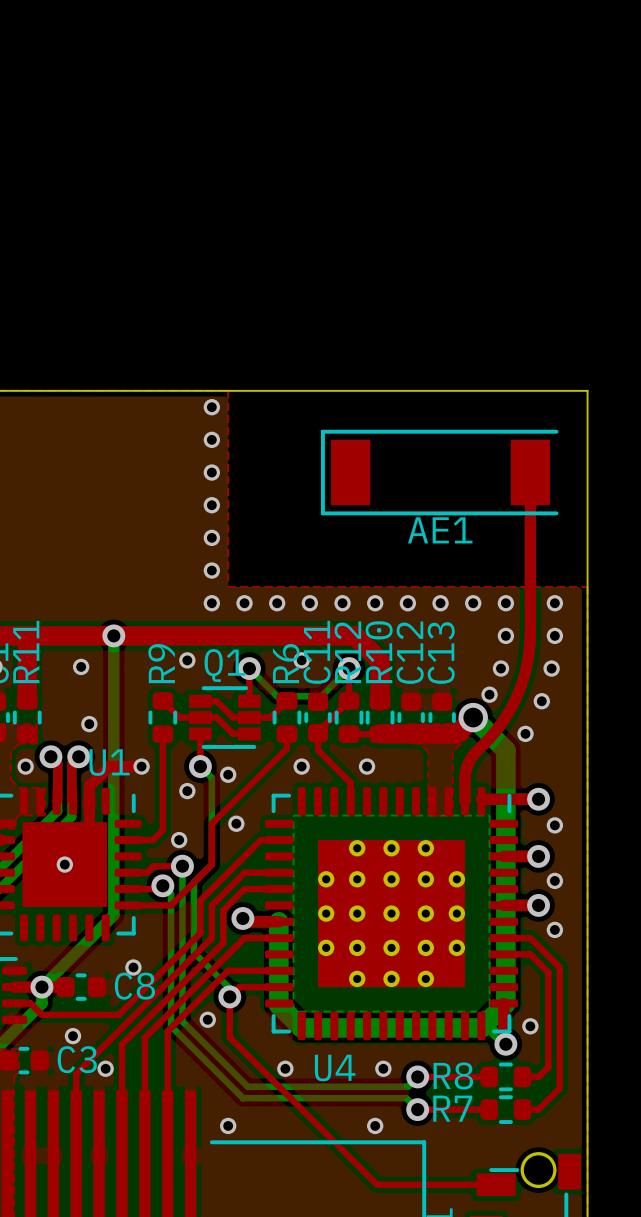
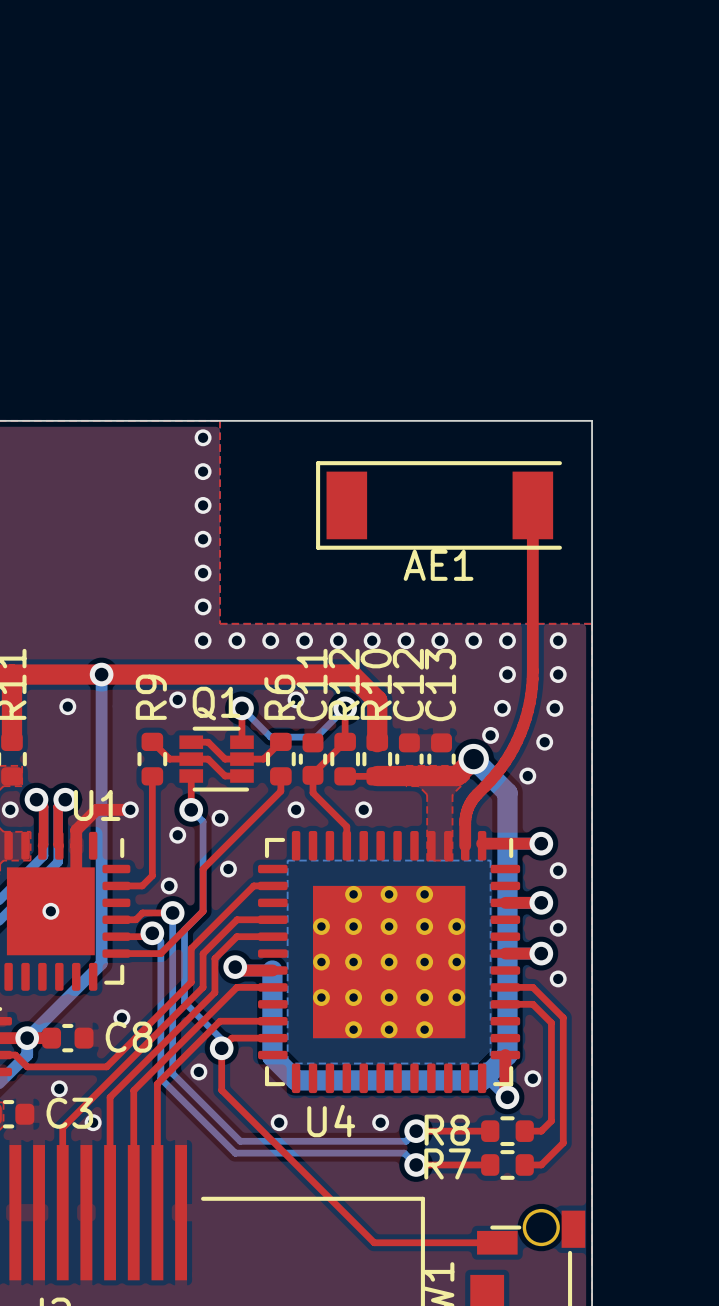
via: (89, 724) -> none
via: (228, 1125) -> none
via: (375, 1125) -> none

